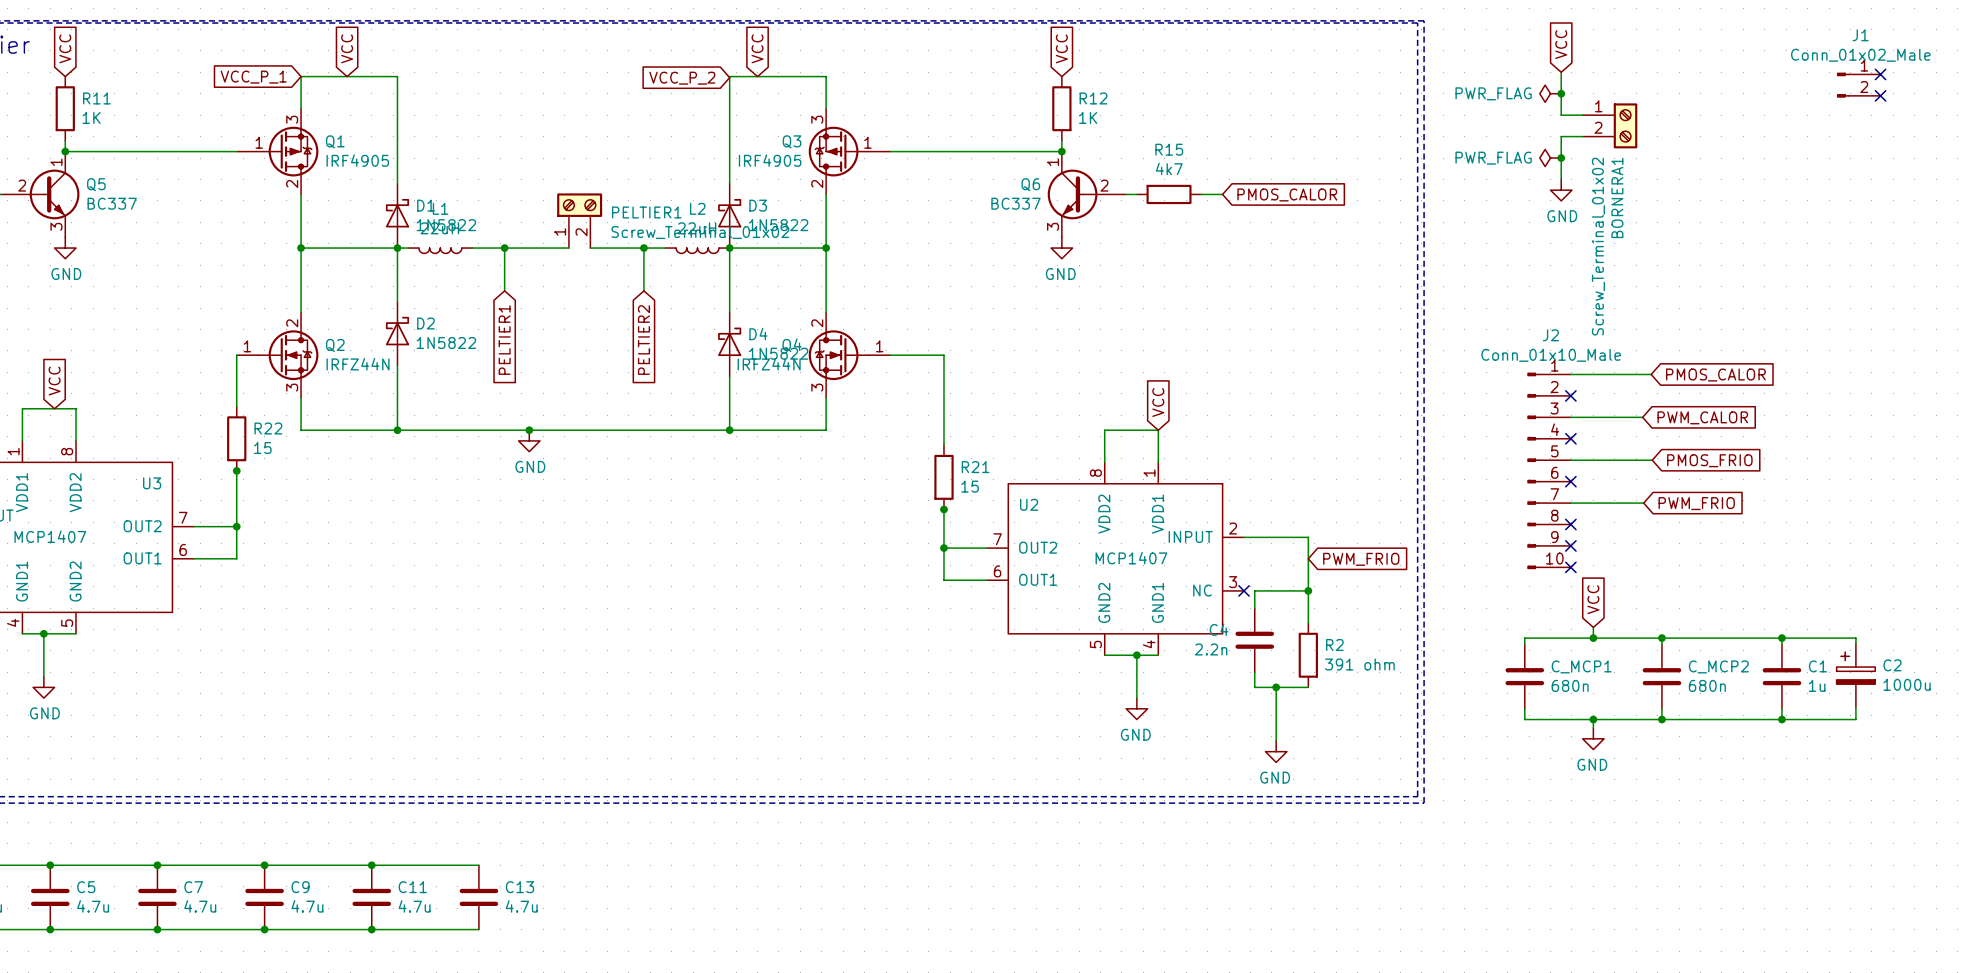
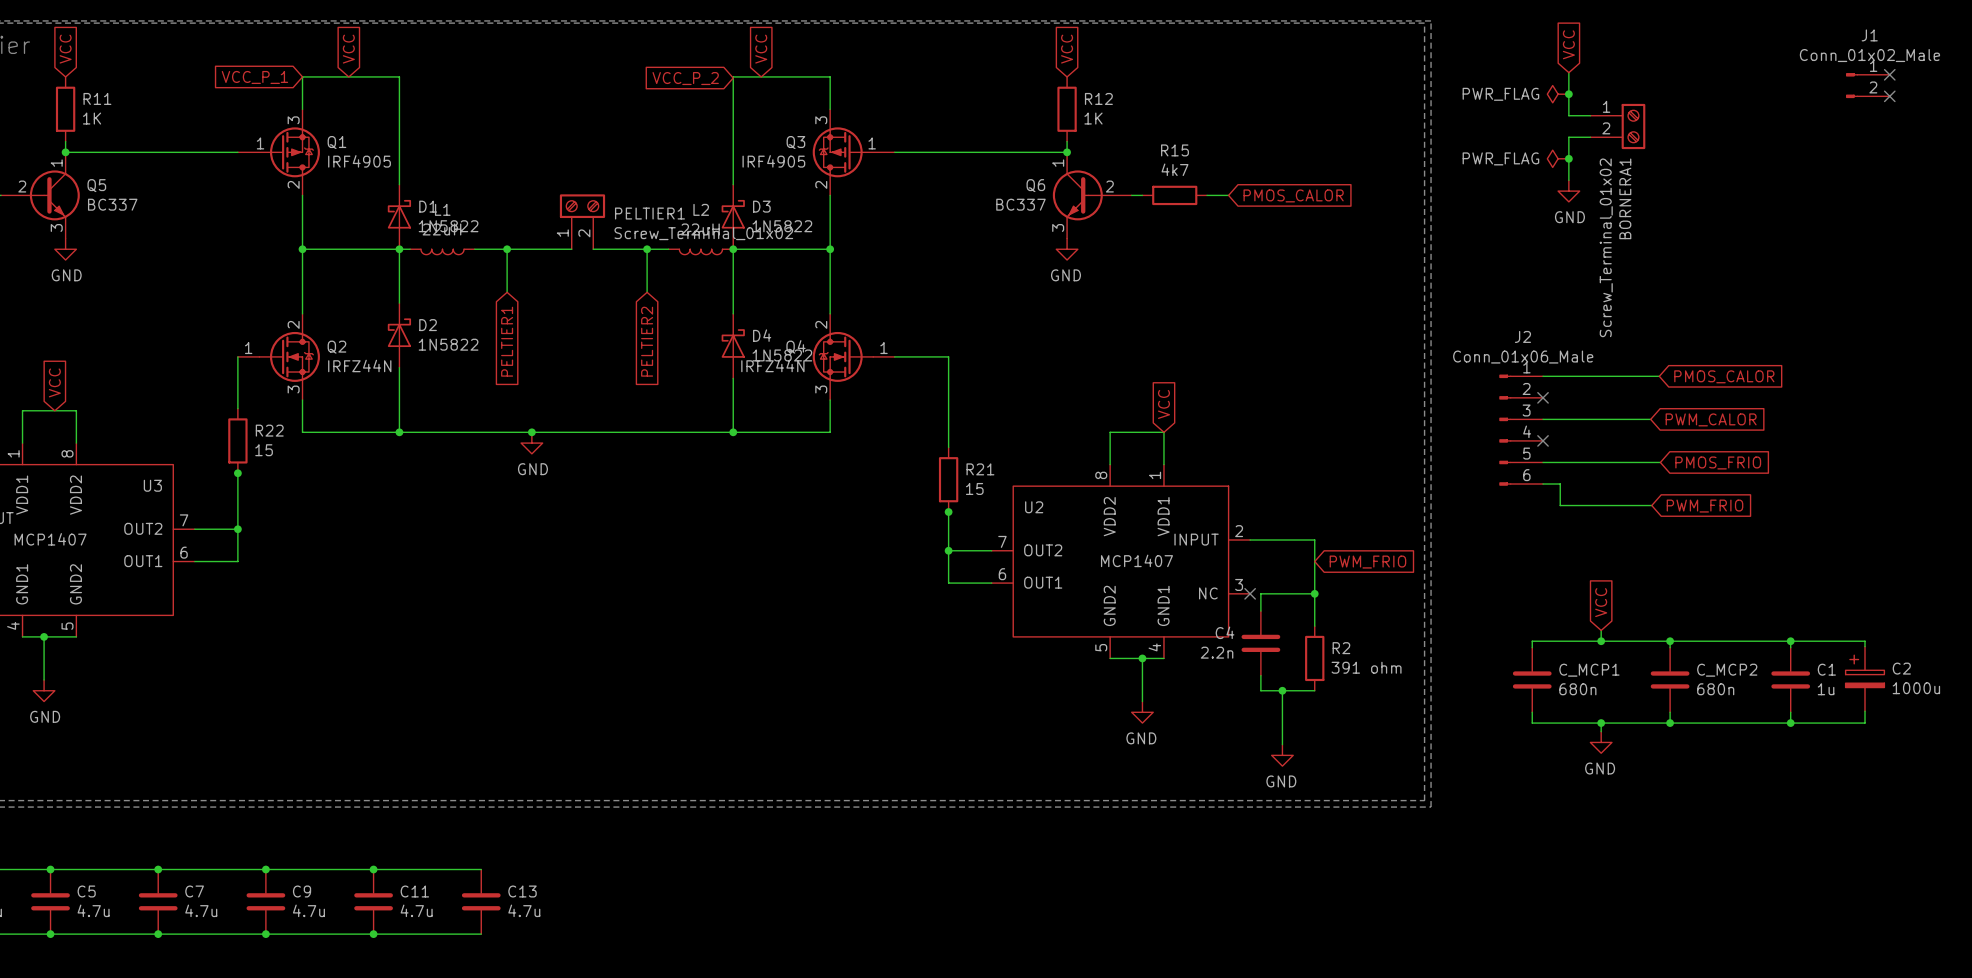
J2 name position: J2 (1550, 335) -> J2 (1522, 336)
J2 value: Conn_01x10_Male (1551, 355) -> Conn_01x06_Male (1523, 357)
J2 symbol: [1527, 372, 1571, 570] -> [1499, 374, 1544, 486]
no-connect mark: none -> (1543, 397)
no-connect mark: (1570, 395) -> none
no-connect mark: none -> (1543, 440)
no-connect mark: (1570, 438) -> none
no-connect mark: (1570, 481) -> none
no-connect mark: (1570, 524) -> none
no-connect mark: (1570, 545) -> none
no-connect mark: (1570, 567) -> none

